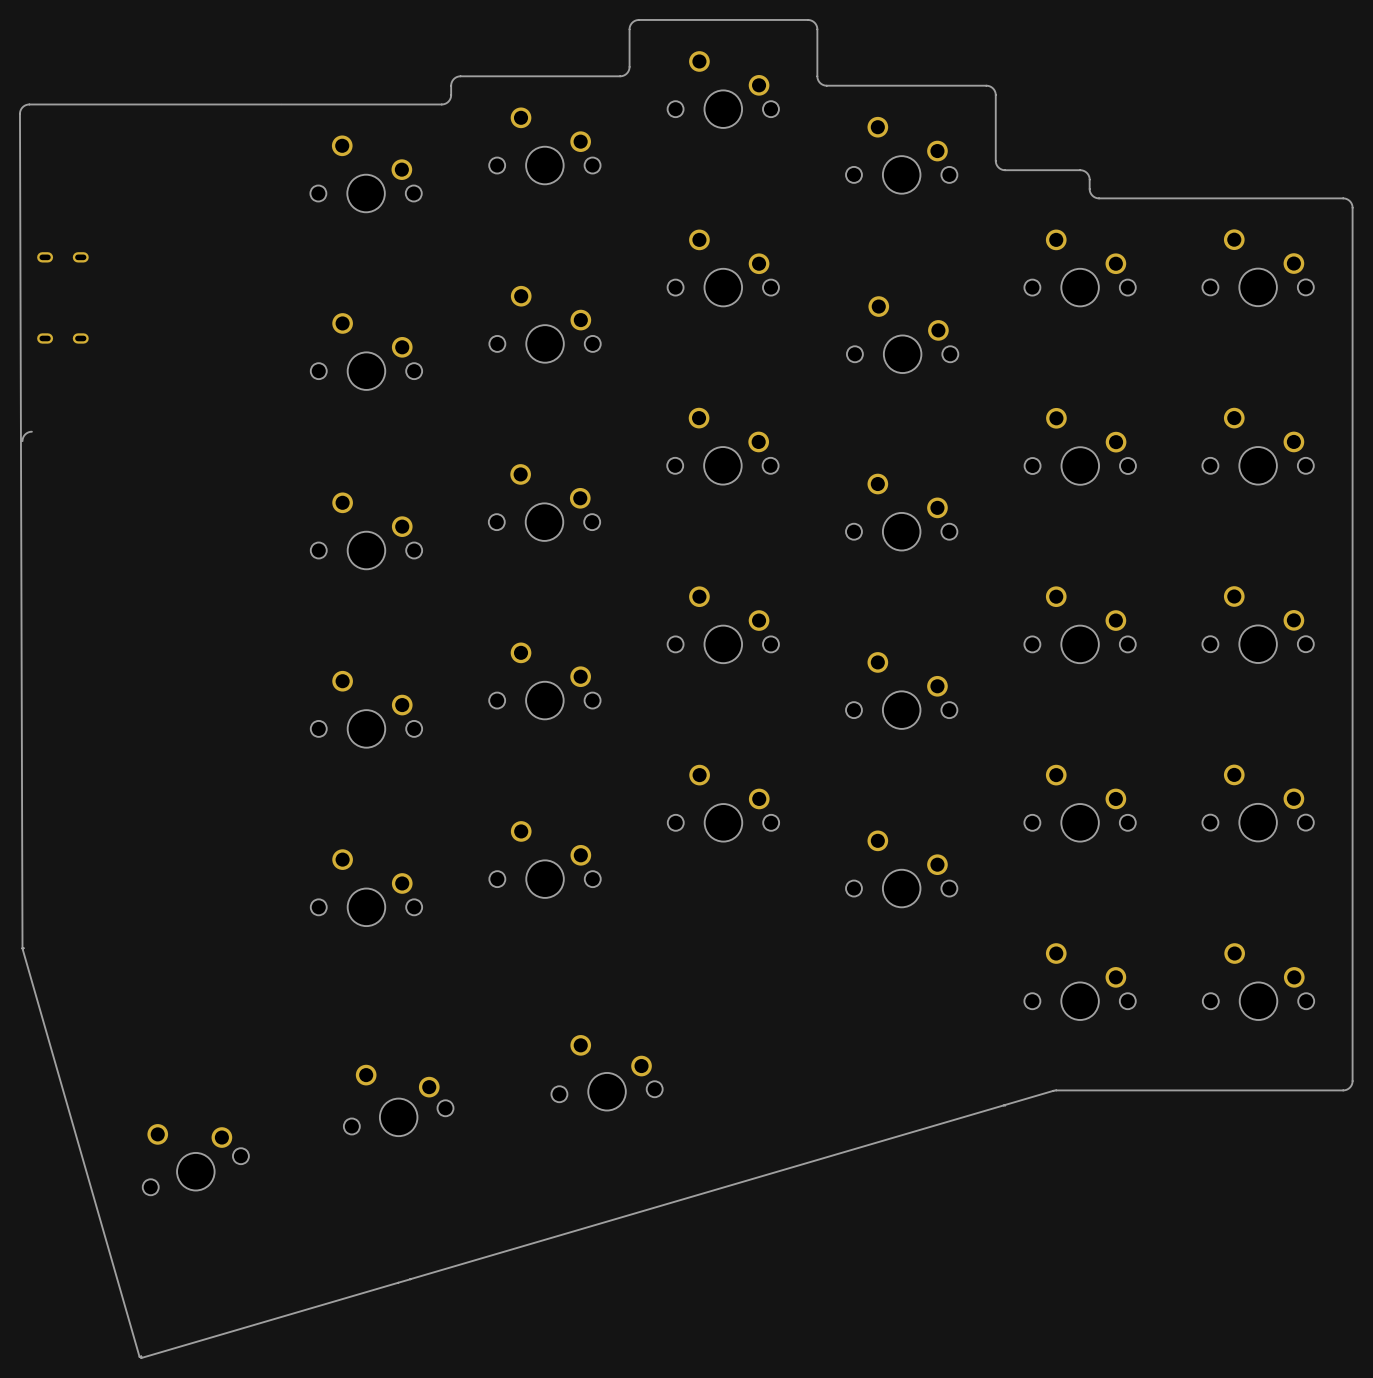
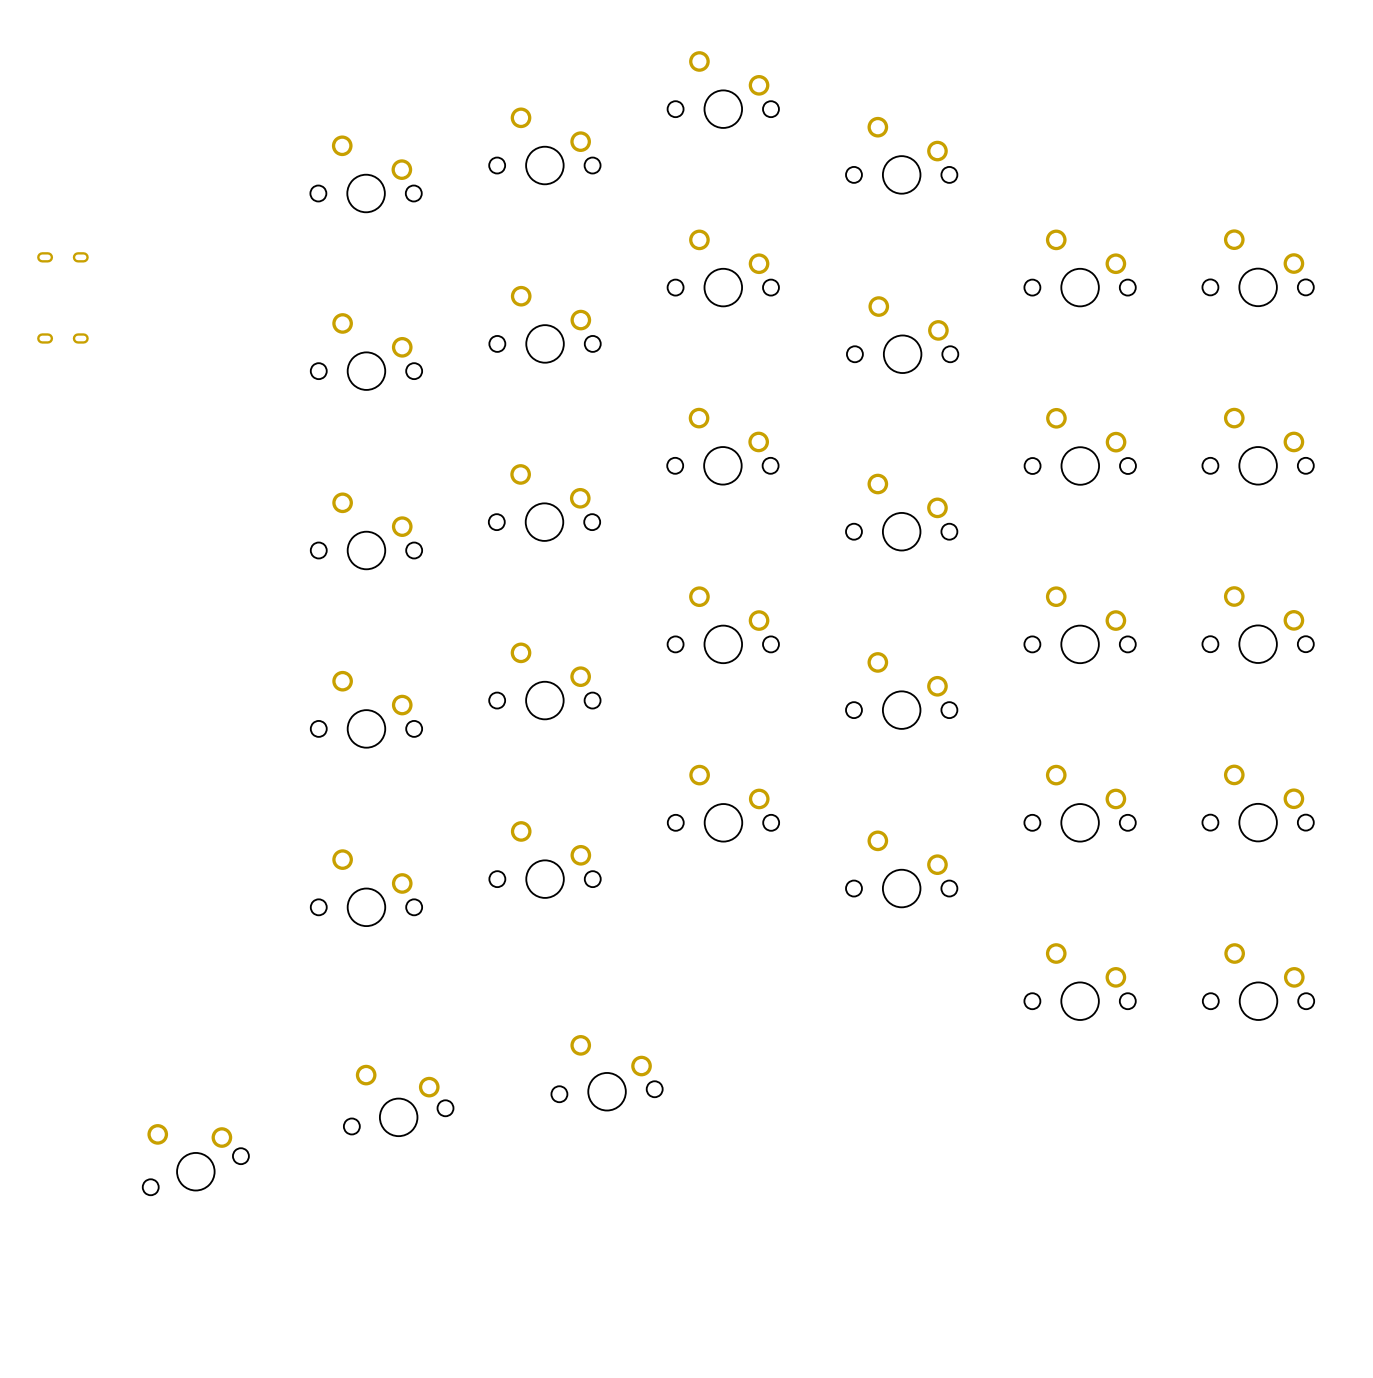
board edge: (281, 104) (29, 104) (24, 105) (20, 110) (22, 948) (139, 1356) (141, 1358) (398, 1282) -> none
board edge: (282, 104) (442, 104) (450, 98) (452, 80) (459, 76) (622, 75) (626, 73) (629, 68) (629, 27) (632, 22) (637, 20) (809, 20) (813, 22) (817, 27) (817, 77) (823, 84) (986, 85) (992, 87) (995, 95) (995, 162) (1001, 169) (1083, 170) (1089, 176) (1090, 193) (1097, 198) (1343, 198) (1349, 200) (1352, 206) (1352, 1081) (1350, 1086) (1343, 1090) (1054, 1090) (398, 1282) -> none
board edge: (31, 431) (25, 434) (22, 441) -> none

